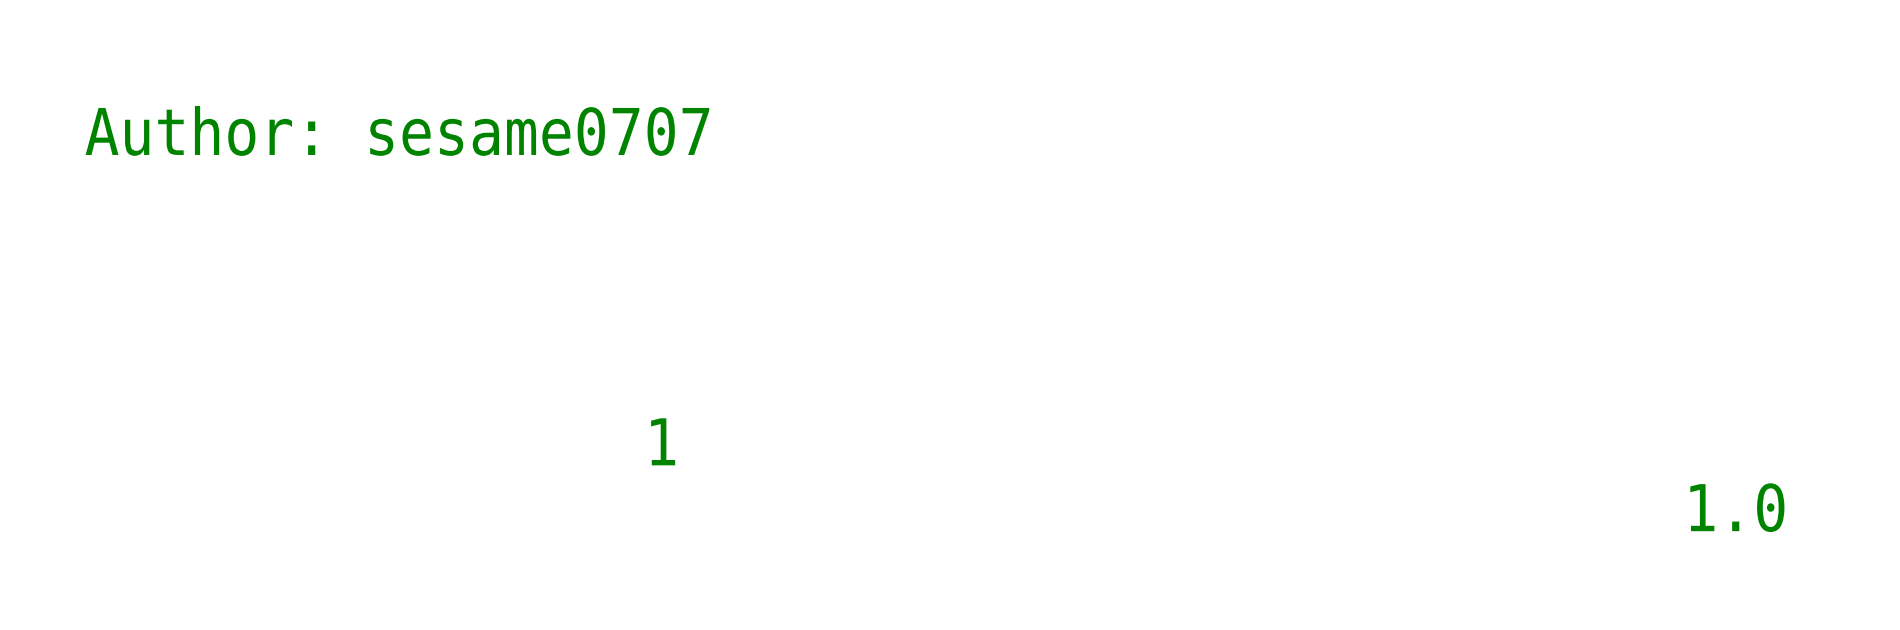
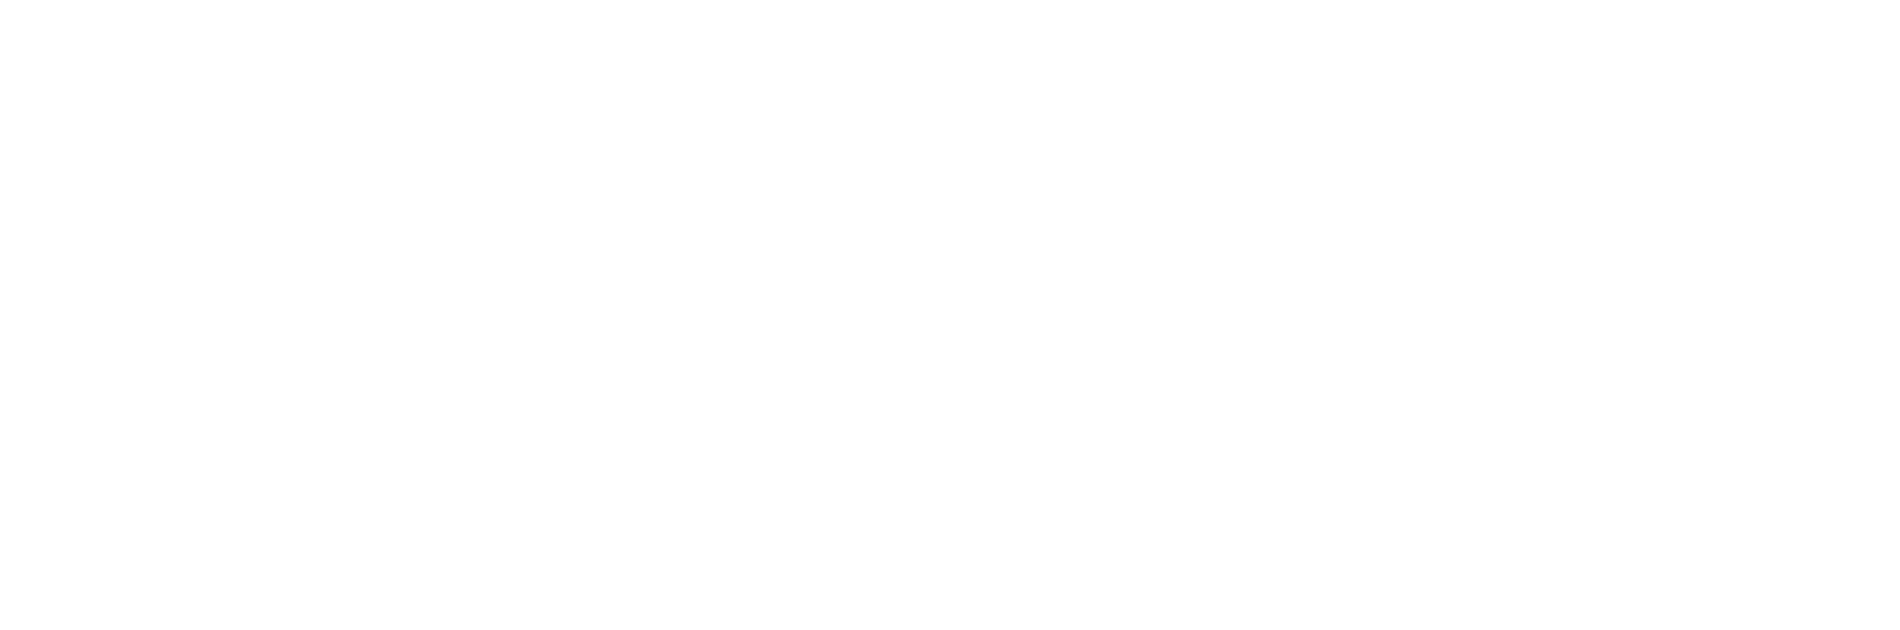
text: Author: sesame0707 (397, 130) -> none
text: 1 (663, 441) -> none
text: 1.0 (1737, 507) -> none

